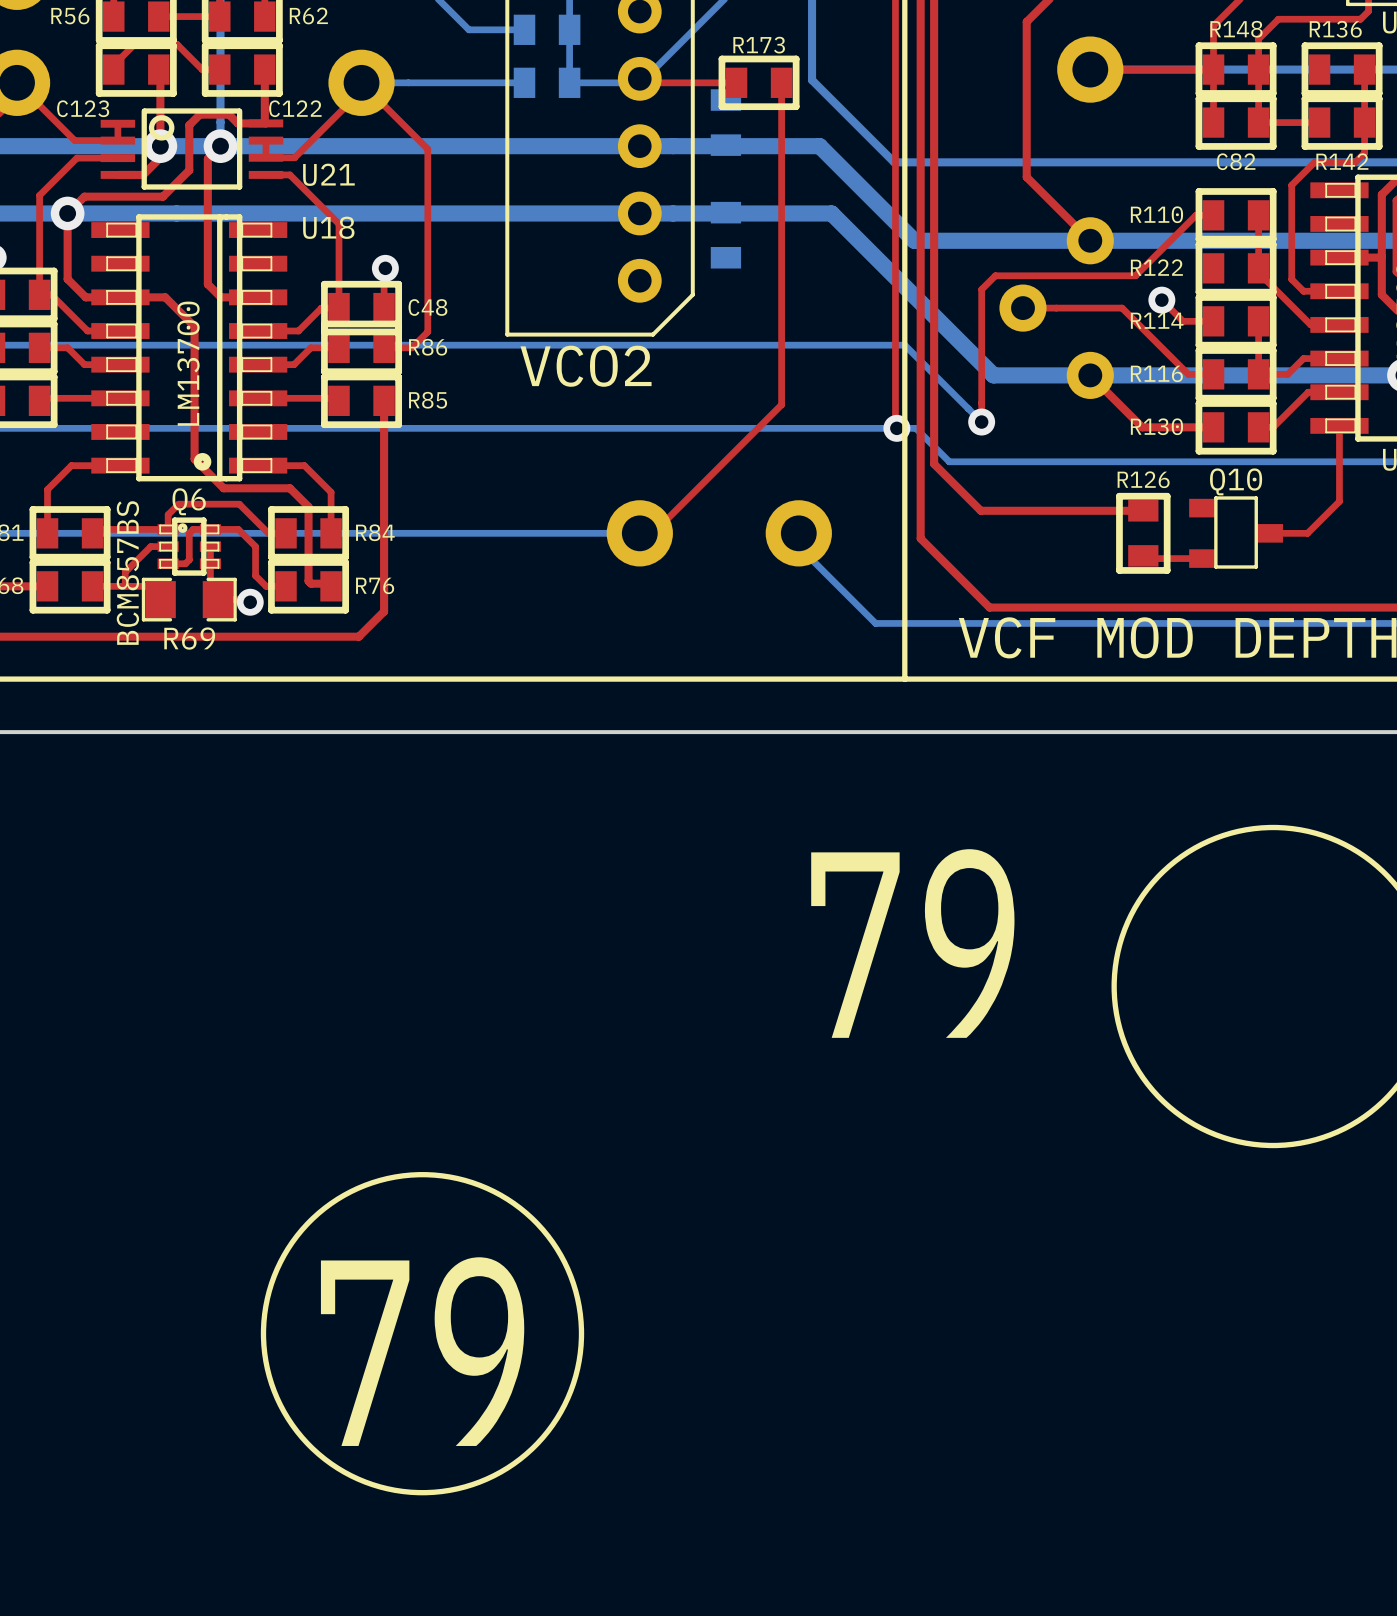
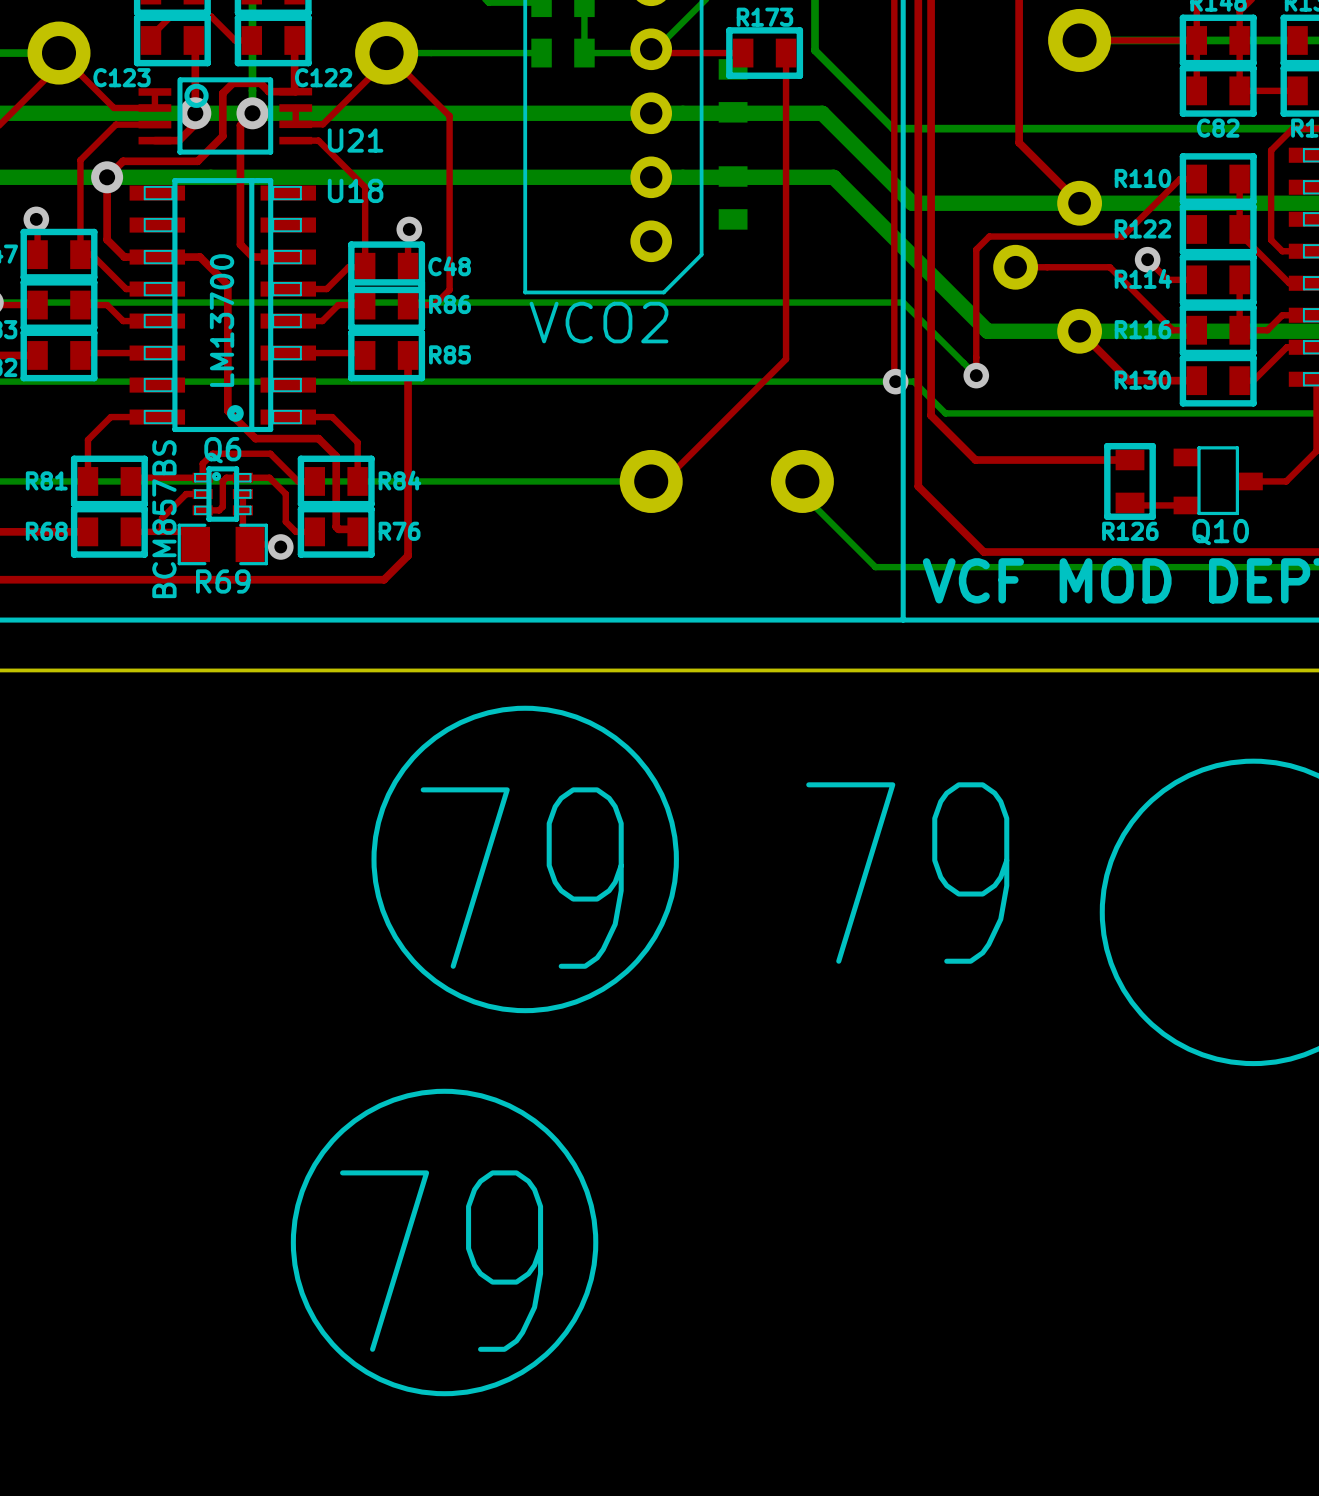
R126 name position: R126 (1143, 479) -> R126 (1130, 531)
Q10 name position: Q10 (1236, 481) -> Q10 (1220, 532)
drawing: none -> [371, 705, 679, 1014]

